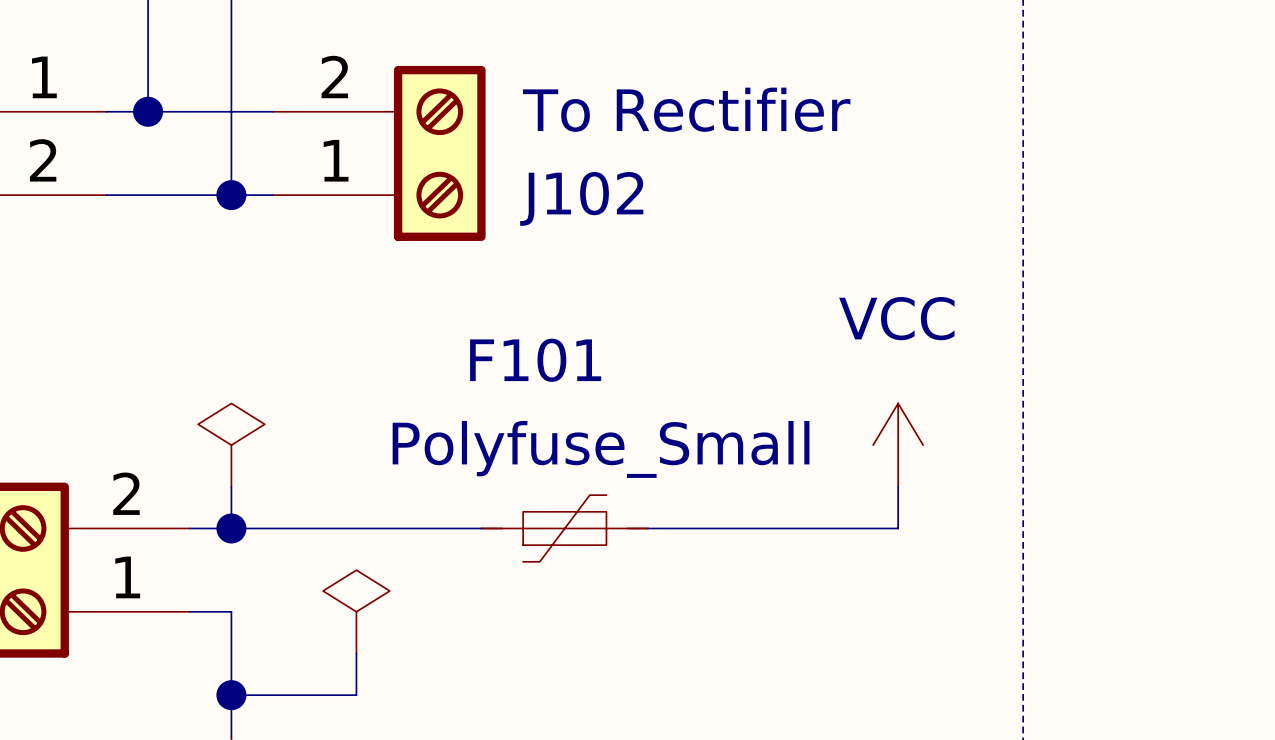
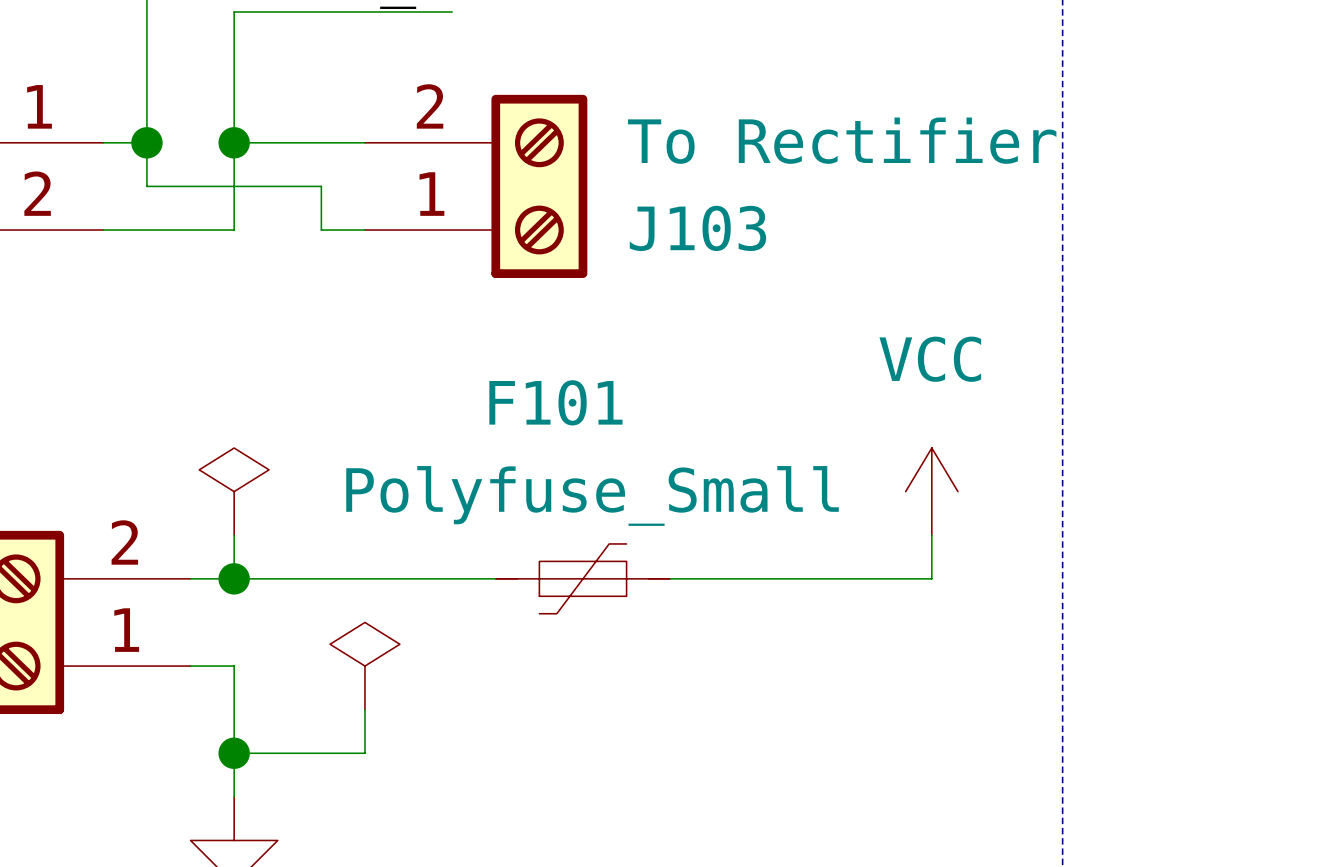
wire: (148, 111) (231, 111) -> (146, 142) (146, 186) (321, 186) (321, 230) (364, 230)
J102: To Rectifier (379, 153) -> none
J103: none -> To Rectifier (476, 186)
wire: (231, 195) (273, 195) -> none
junction position: (231, 195) -> (234, 142)

